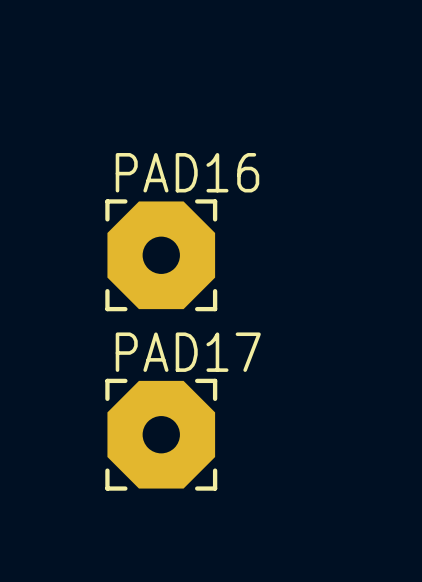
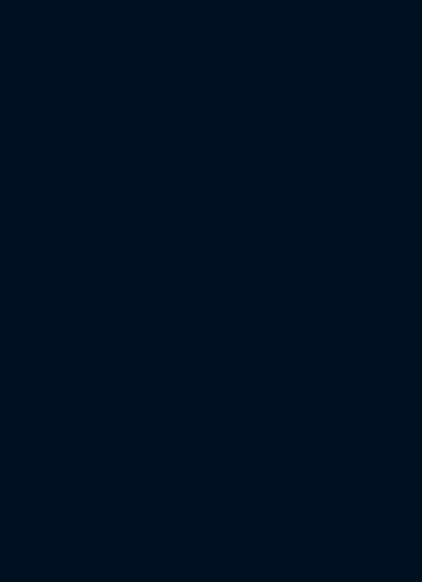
PAD16: (161, 255) -> none
PAD17: (161, 434) -> none

